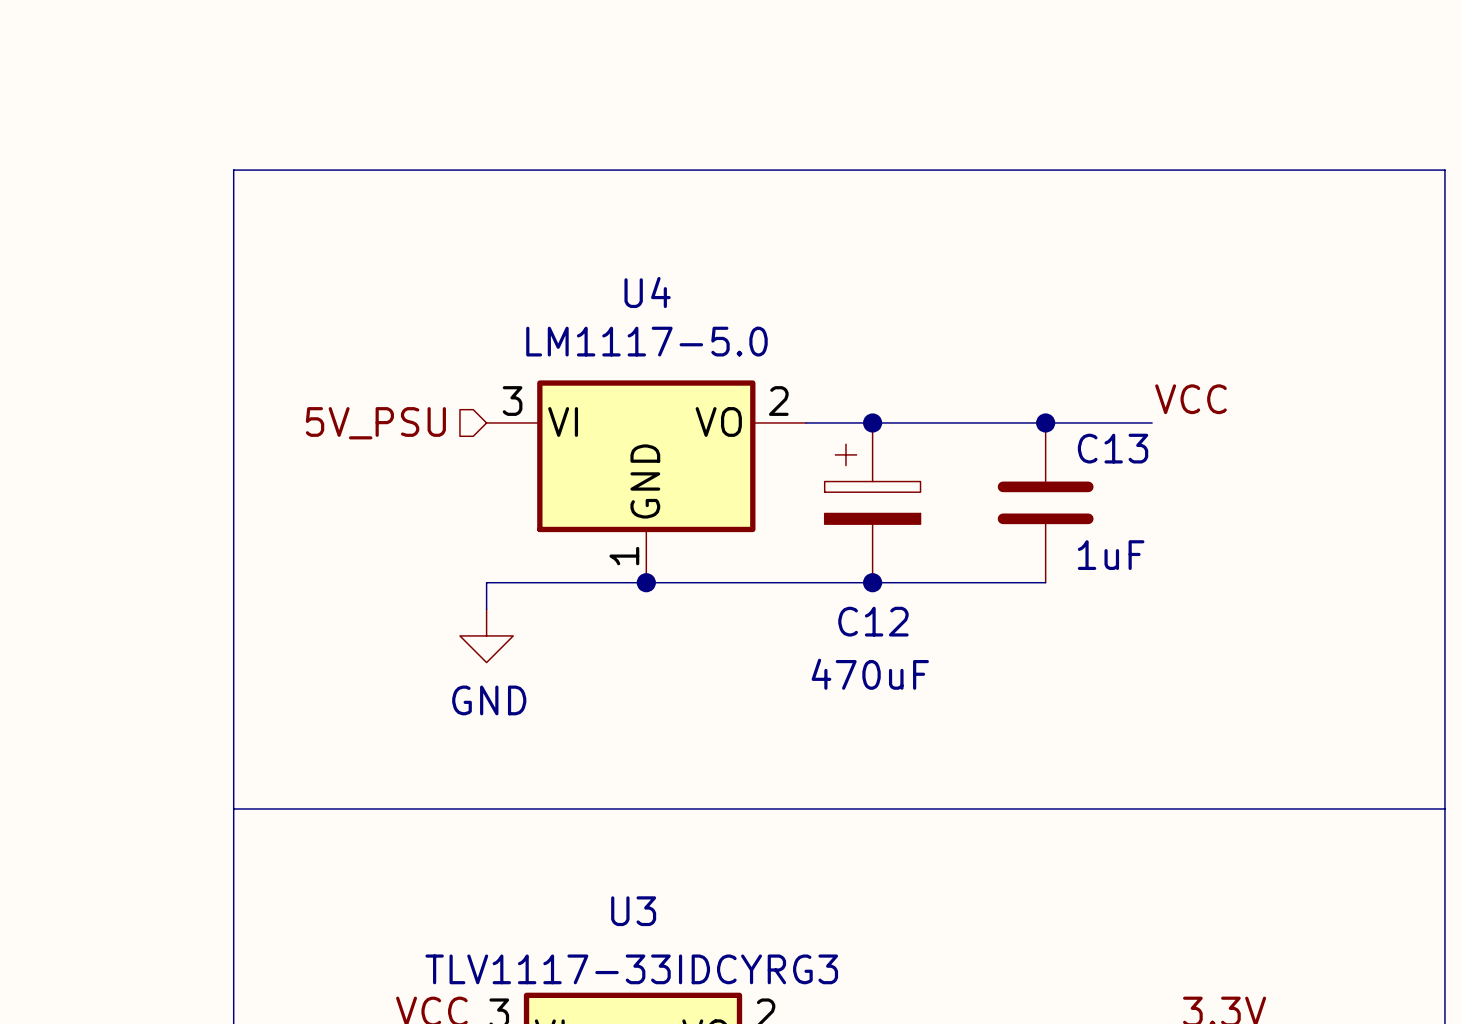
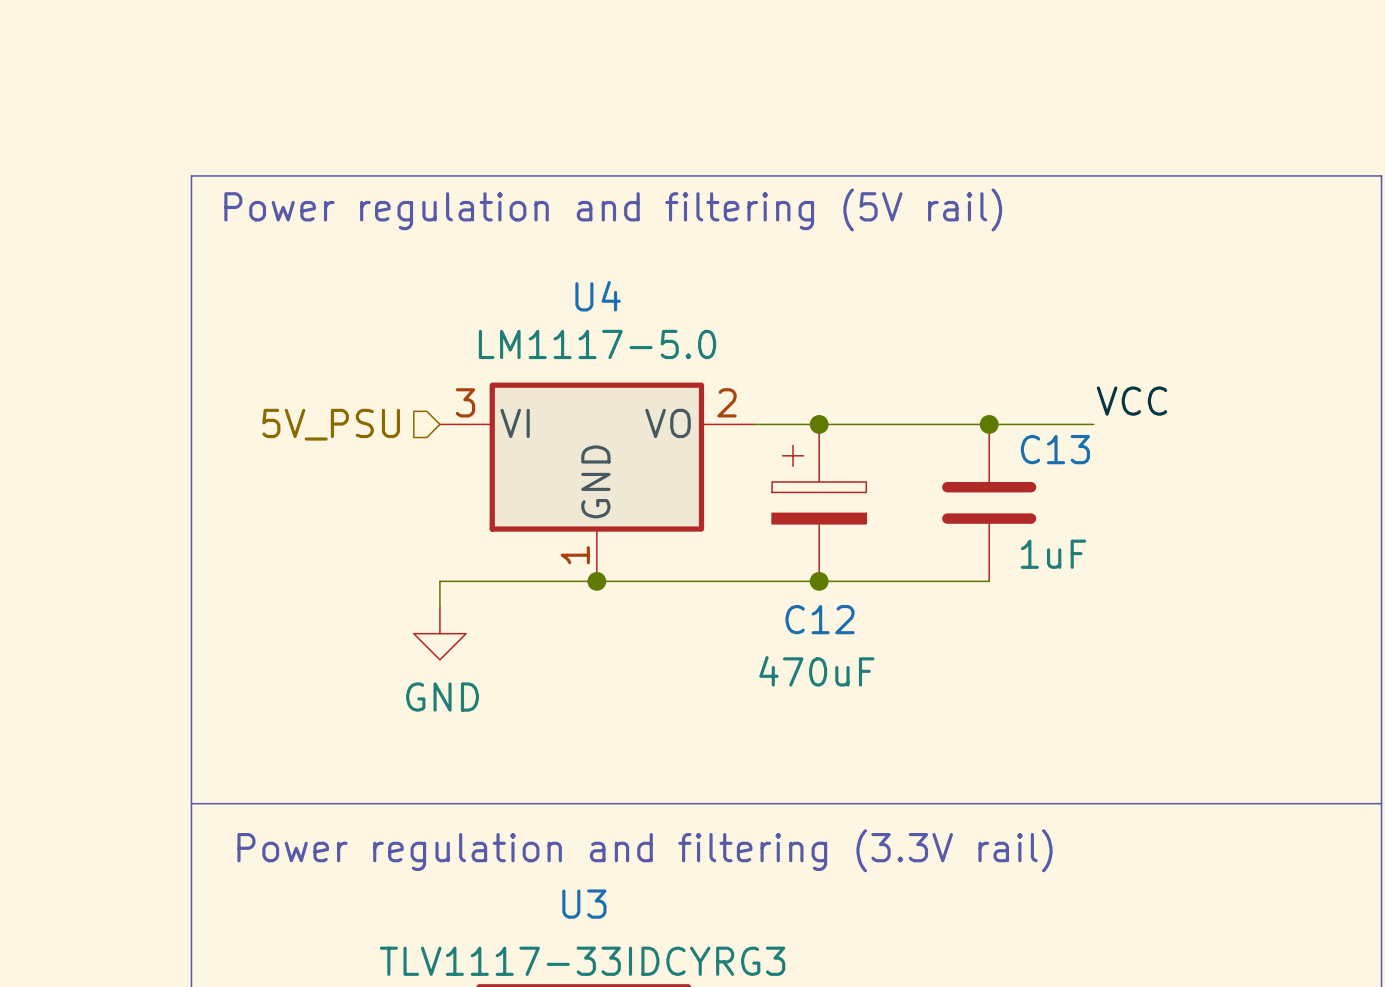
text: none -> Power regulation and filtering (5V rail) (613, 209)
text: none -> Power regulation and filtering (3.3V rail) (645, 850)

